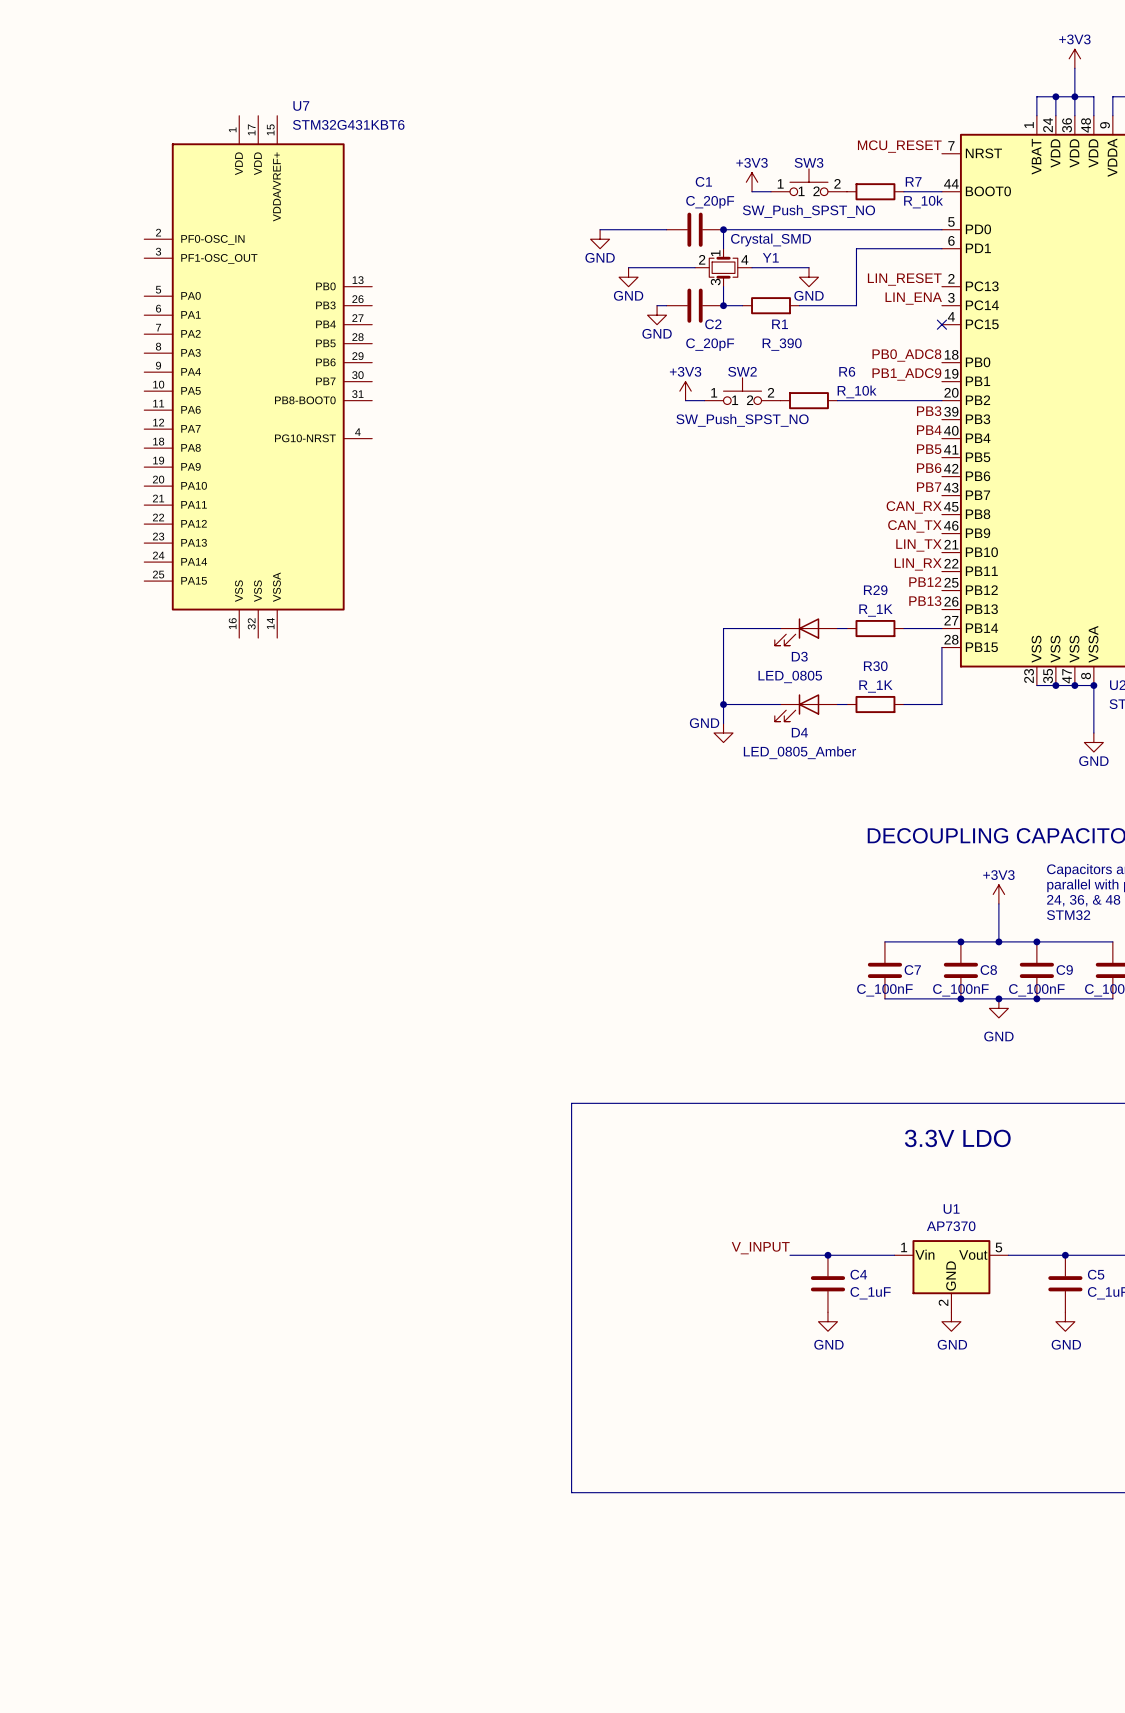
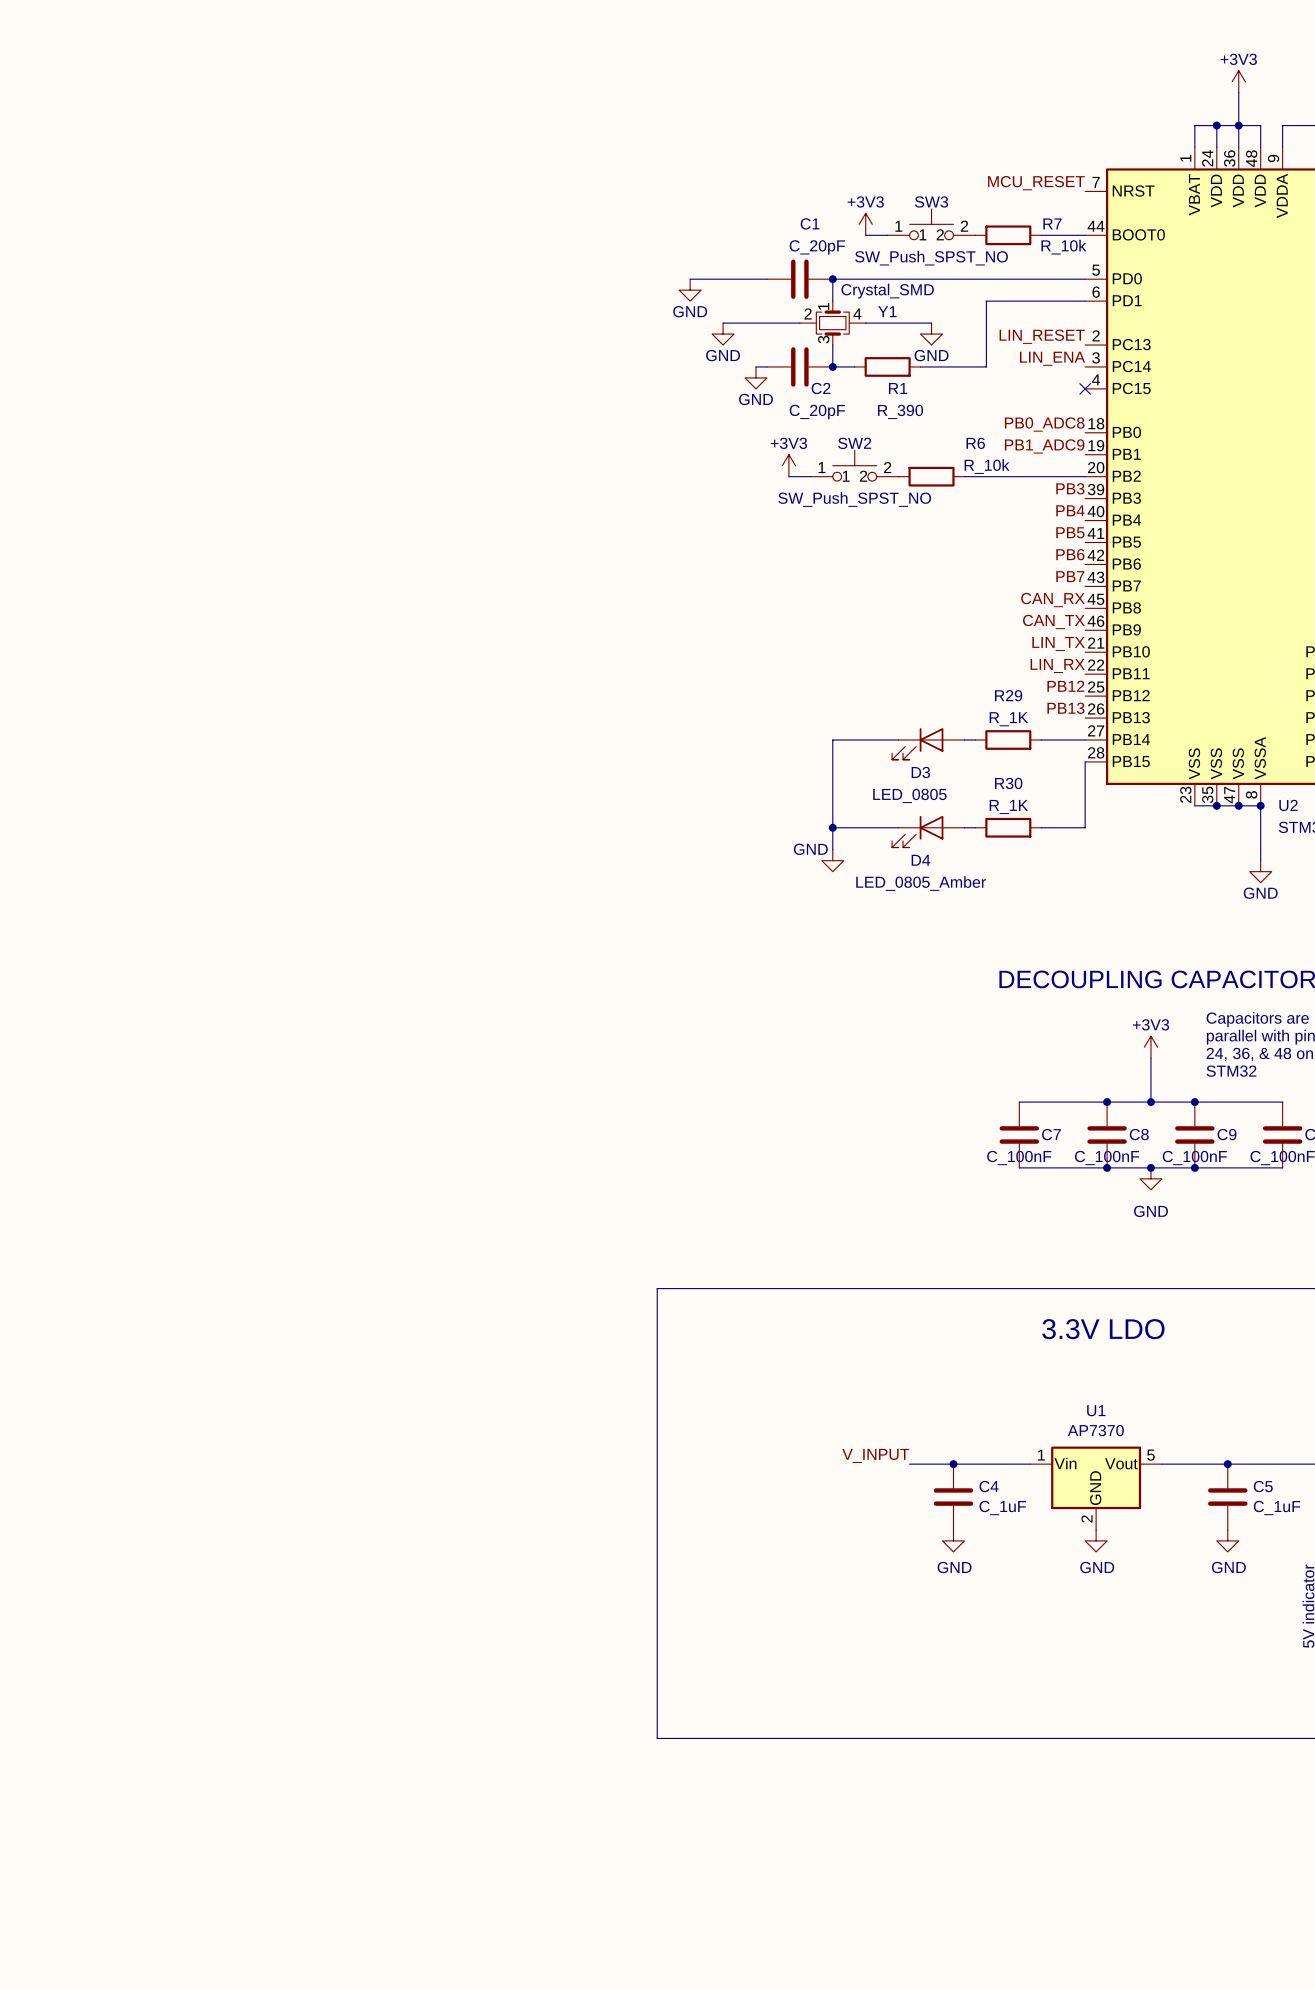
U7: STM32G431KBT6 (258, 376) -> none

